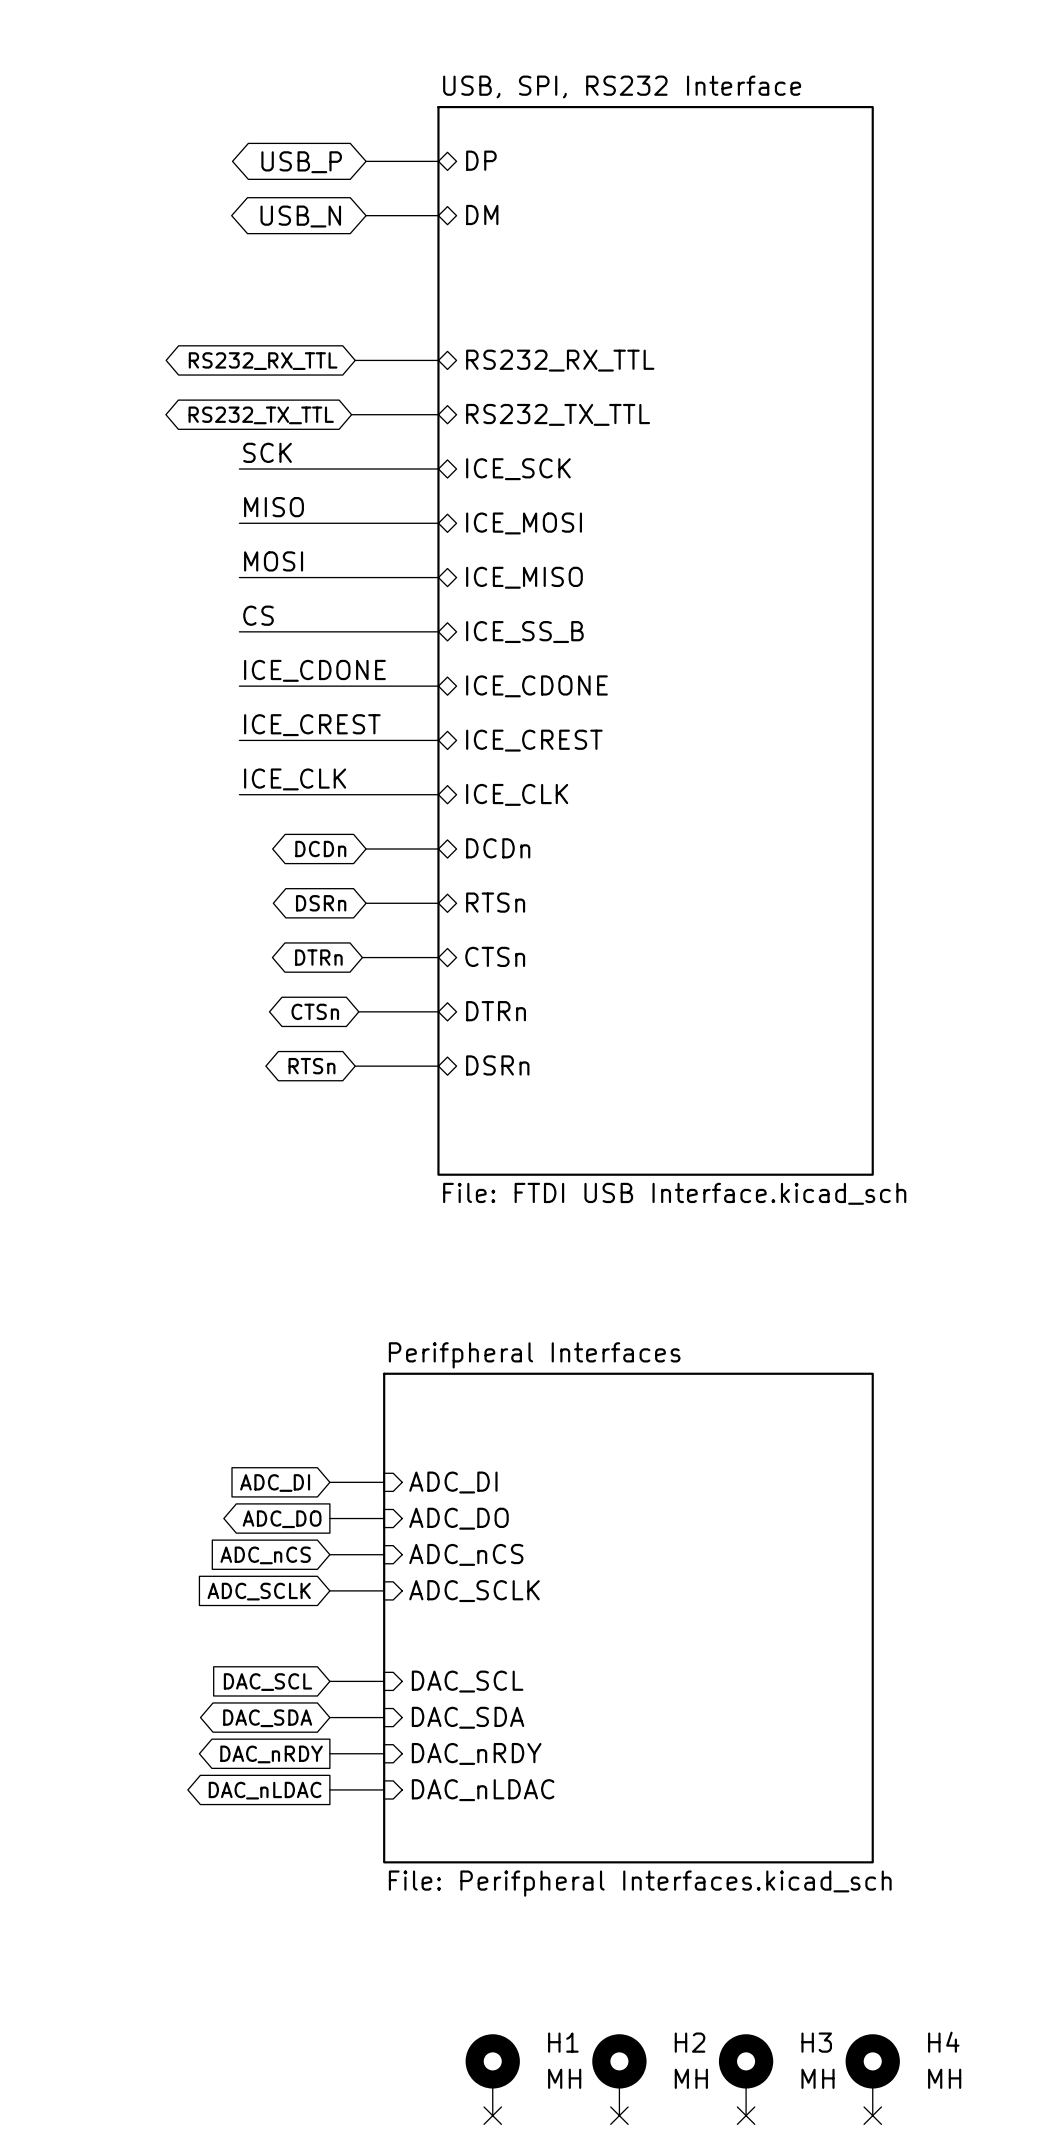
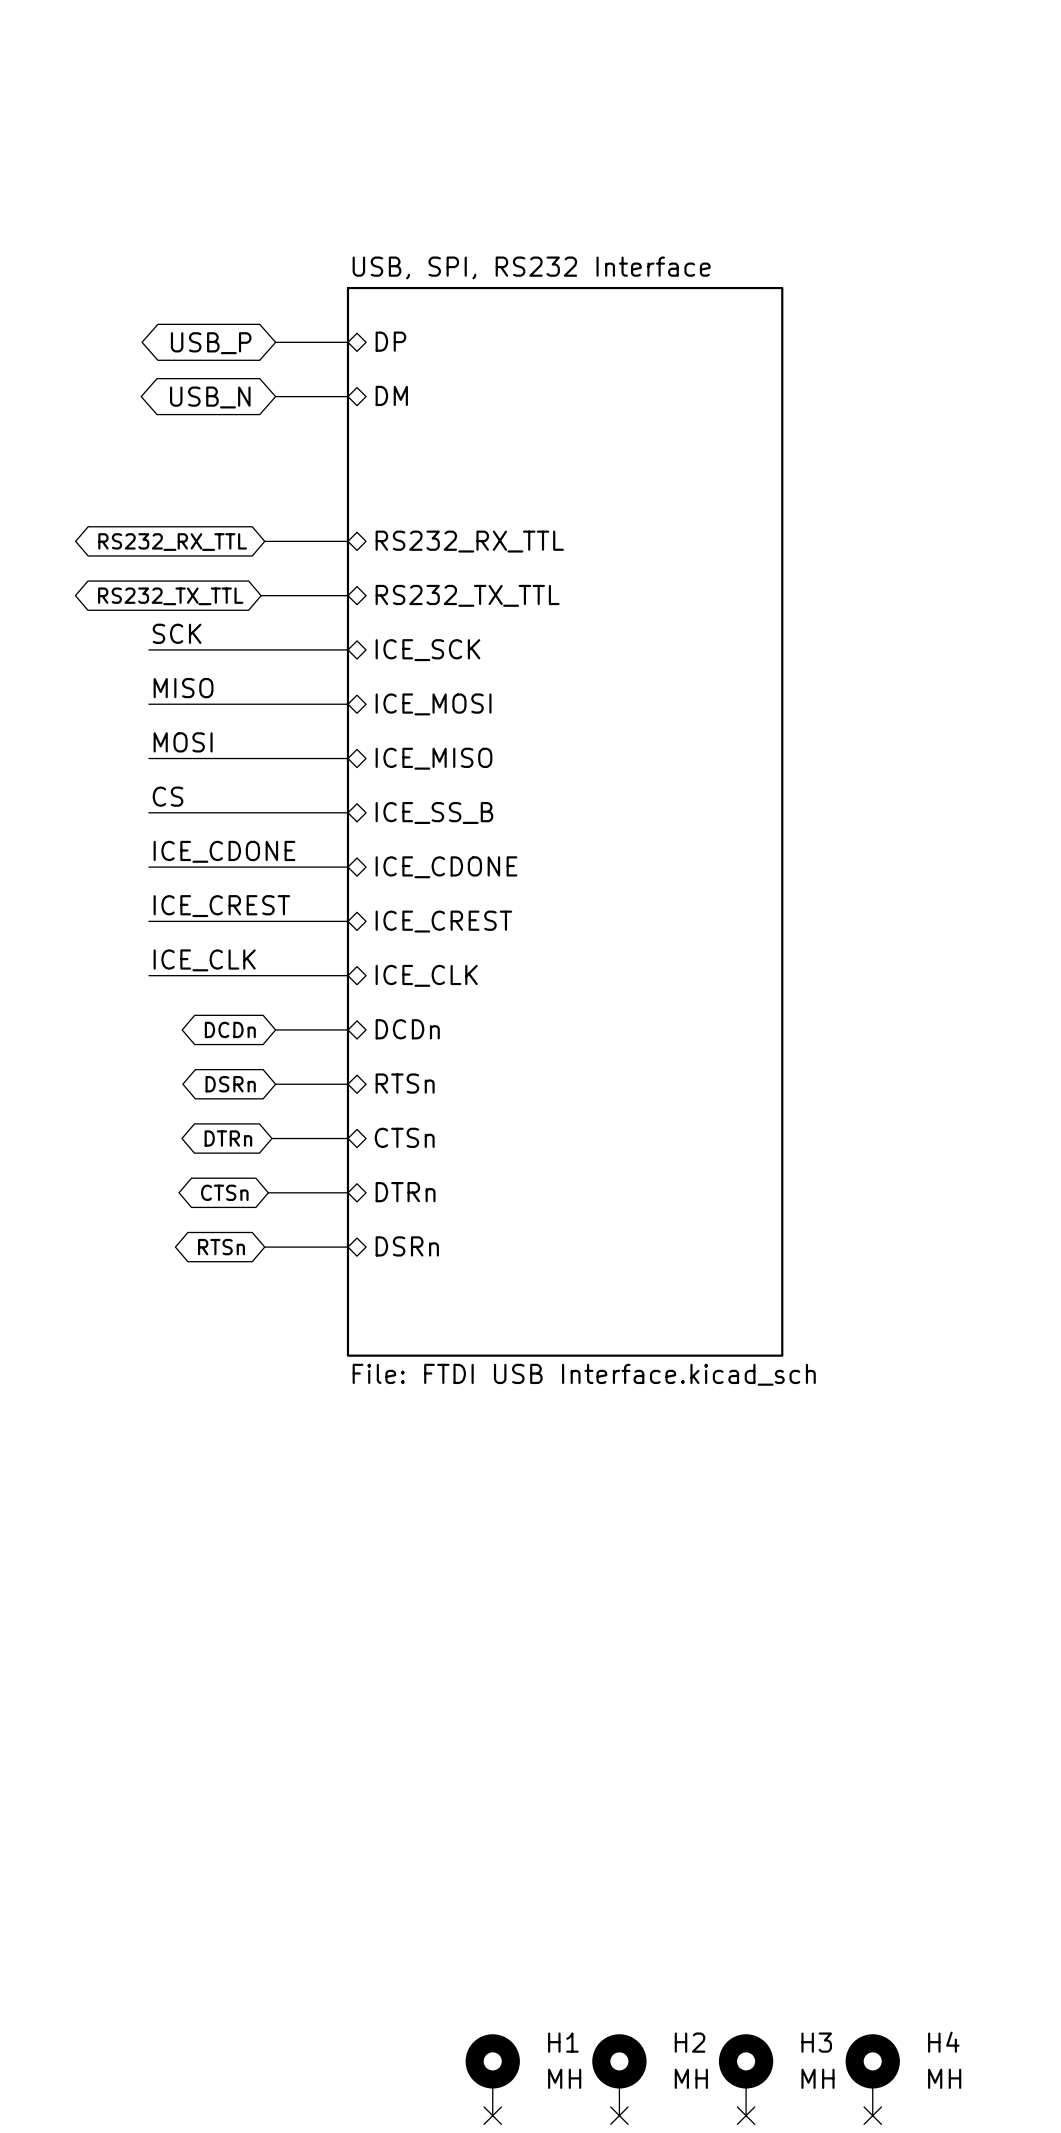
sheet pin position: DP (481, 160) -> DP (390, 341)
wire: (366, 161) (438, 161) -> (275, 342) (347, 342)
global label position: USB_P (301, 162) -> USB_P (211, 343)
sheet pin position: DM (482, 214) -> DM (391, 395)
wire: (366, 215) (438, 215) -> (275, 396) (347, 396)
global label position: USB_N (300, 216) -> USB_N (210, 397)
wire: (355, 360) (438, 360) -> (264, 541) (347, 541)
sheet pin position: RS232_RX_TTL (560, 360) -> RS232_RX_TTL (469, 541)
global label position: RS232_RX_TTL (263, 361) -> RS232_RX_TTL (172, 542)
wire: (351, 414) (438, 414) -> (261, 595) (347, 595)
sheet pin position: RS232_TX_TTL (558, 414) -> RS232_TX_TTL (467, 595)
global label position: RS232_TX_TTL (261, 415) -> RS232_TX_TTL (170, 596)
label position: SCK (267, 452) -> SCK (177, 633)
wire: (239, 468) (438, 468) -> (148, 649) (347, 649)
sheet pin position: ICE_SCK (518, 469) -> ICE_SCK (427, 650)
label position: MISO (274, 507) -> MISO (183, 688)
wire: (239, 523) (438, 523) -> (148, 704) (347, 704)
sheet pin position: ICE_MOSI (524, 523) -> ICE_MOSI (433, 704)
label position: MOSI (273, 561) -> MOSI (183, 742)
wire: (239, 577) (438, 577) -> (148, 758) (347, 758)
sheet pin position: ICE_MISO (524, 577) -> ICE_MISO (434, 758)
label position: CS (258, 615) -> CS (168, 796)
wire: (239, 631) (438, 631) -> (148, 812) (347, 812)
sheet pin position: ICE_SS_B (524, 632) -> ICE_SS_B (434, 812)
sheet USB, SPI, RS232 Interface position: (655, 640) -> (565, 821)
label position: ICE_CDONE (314, 670) -> ICE_CDONE (224, 851)
wire: (239, 686) (438, 686) -> (148, 867) (347, 867)
sheet pin position: ICE_CDONE (536, 686) -> ICE_CDONE (446, 867)
label position: ICE_CREST (312, 725) -> ICE_CREST (221, 906)
wire: (239, 740) (438, 740) -> (148, 921) (347, 921)
sheet pin position: ICE_CREST (534, 740) -> ICE_CREST (443, 921)
label position: ICE_CLK (295, 779) -> ICE_CLK (204, 960)
wire: (239, 794) (438, 794) -> (148, 975) (347, 975)
sheet pin position: ICE_CLK (517, 794) -> ICE_CLK (426, 975)
global label position: DCDn (320, 848) -> DCDn (230, 1029)
wire: (366, 848) (438, 848) -> (275, 1029) (347, 1029)
sheet pin position: DCDn (498, 848) -> DCDn (407, 1029)
sheet pin position: RTSn (495, 902) -> RTSn (405, 1083)
global label position: DSRn (321, 903) -> DSRn (230, 1084)
wire: (366, 903) (438, 903) -> (275, 1084) (347, 1084)
sheet pin position: CTSn (495, 956) -> CTSn (404, 1137)
global label position: DTRn (318, 957) -> DTRn (228, 1138)
wire: (362, 957) (438, 957) -> (271, 1138) (347, 1138)
global label position: CTSn (315, 1011) -> CTSn (224, 1192)
wire: (358, 1011) (438, 1011) -> (268, 1192) (347, 1192)
sheet pin position: DTRn (496, 1011) -> DTRn (405, 1192)
sheet pin position: DSRn (497, 1065) -> DSRn (407, 1246)
global label position: RTSn (311, 1066) -> RTSn (221, 1247)
wire: (355, 1066) (438, 1066) -> (264, 1247) (347, 1247)
wire: (329, 1482) (384, 1482) -> none
sheet pin: ADC_DI (453, 1482) -> none
global label: ADC_DI (275, 1483) -> none
wire: (329, 1518) (384, 1518) -> none
sheet pin: ADC_DO (458, 1518) -> none
global label: ADC_DO (282, 1519) -> none
wire: (329, 1554) (384, 1554) -> none
sheet pin: ADC_nCS (466, 1554) -> none
global label: ADC_nCS (265, 1555) -> none
wire: (329, 1590) (384, 1590) -> none
global label: ADC_SCLK (259, 1591) -> none
sheet pin: ADC_SCLK (474, 1591) -> none
sheet Perifpheral Interfaces: File: Perifpheral Interfaces.kicad_sch (628, 1618) -> none
wire: (329, 1681) (384, 1681) -> none
sheet pin: DAC_SCL (467, 1681) -> none
global label: DAC_SCL (267, 1682) -> none
wire: (329, 1717) (384, 1717) -> none
sheet pin: DAC_SDA (468, 1717) -> none
global label: DAC_SDA (267, 1718) -> none
wire: (329, 1753) (384, 1753) -> none
sheet pin: DAC_nRDY (476, 1753) -> none
global label: DAC_nRDY (271, 1754) -> none
wire: (329, 1789) (384, 1789) -> none
global label: DAC_nLDAC (265, 1790) -> none
sheet pin: DAC_nLDAC (483, 1790) -> none

